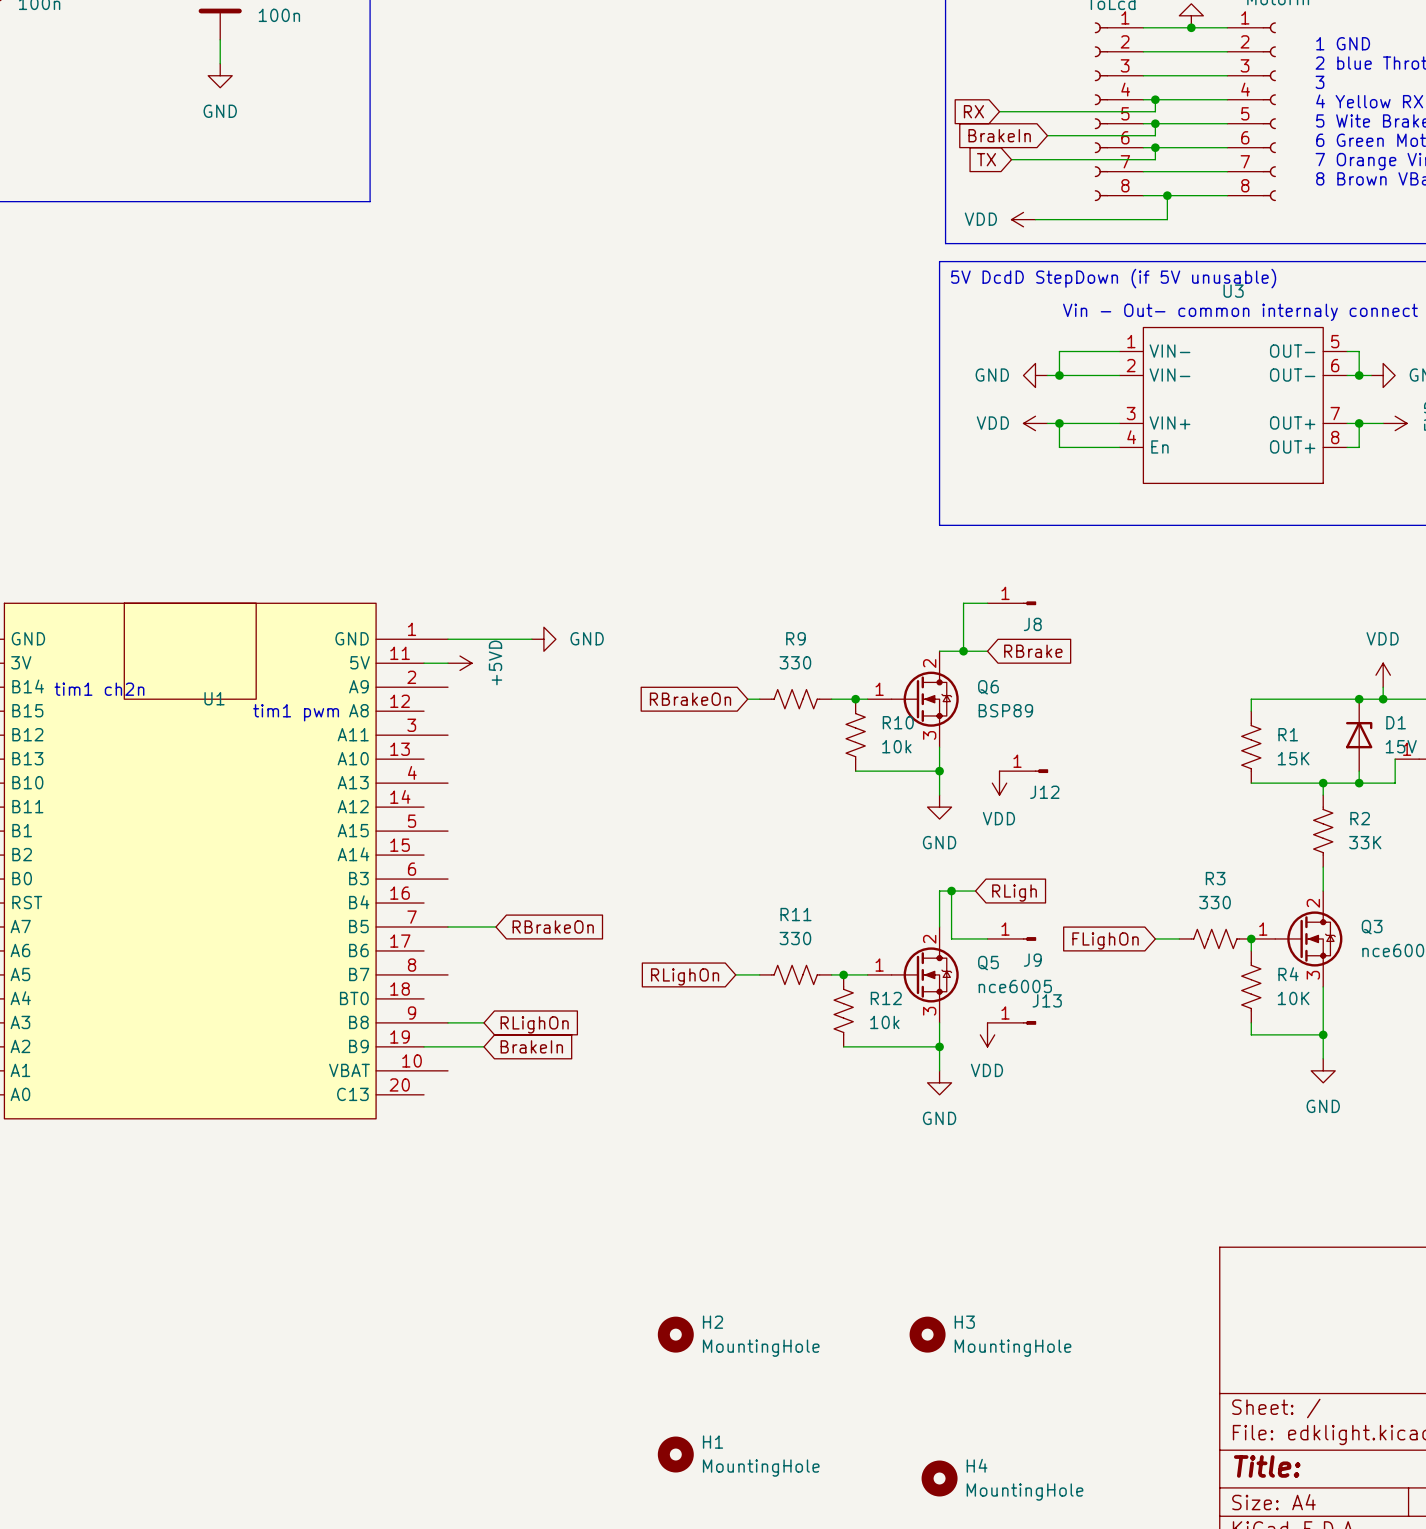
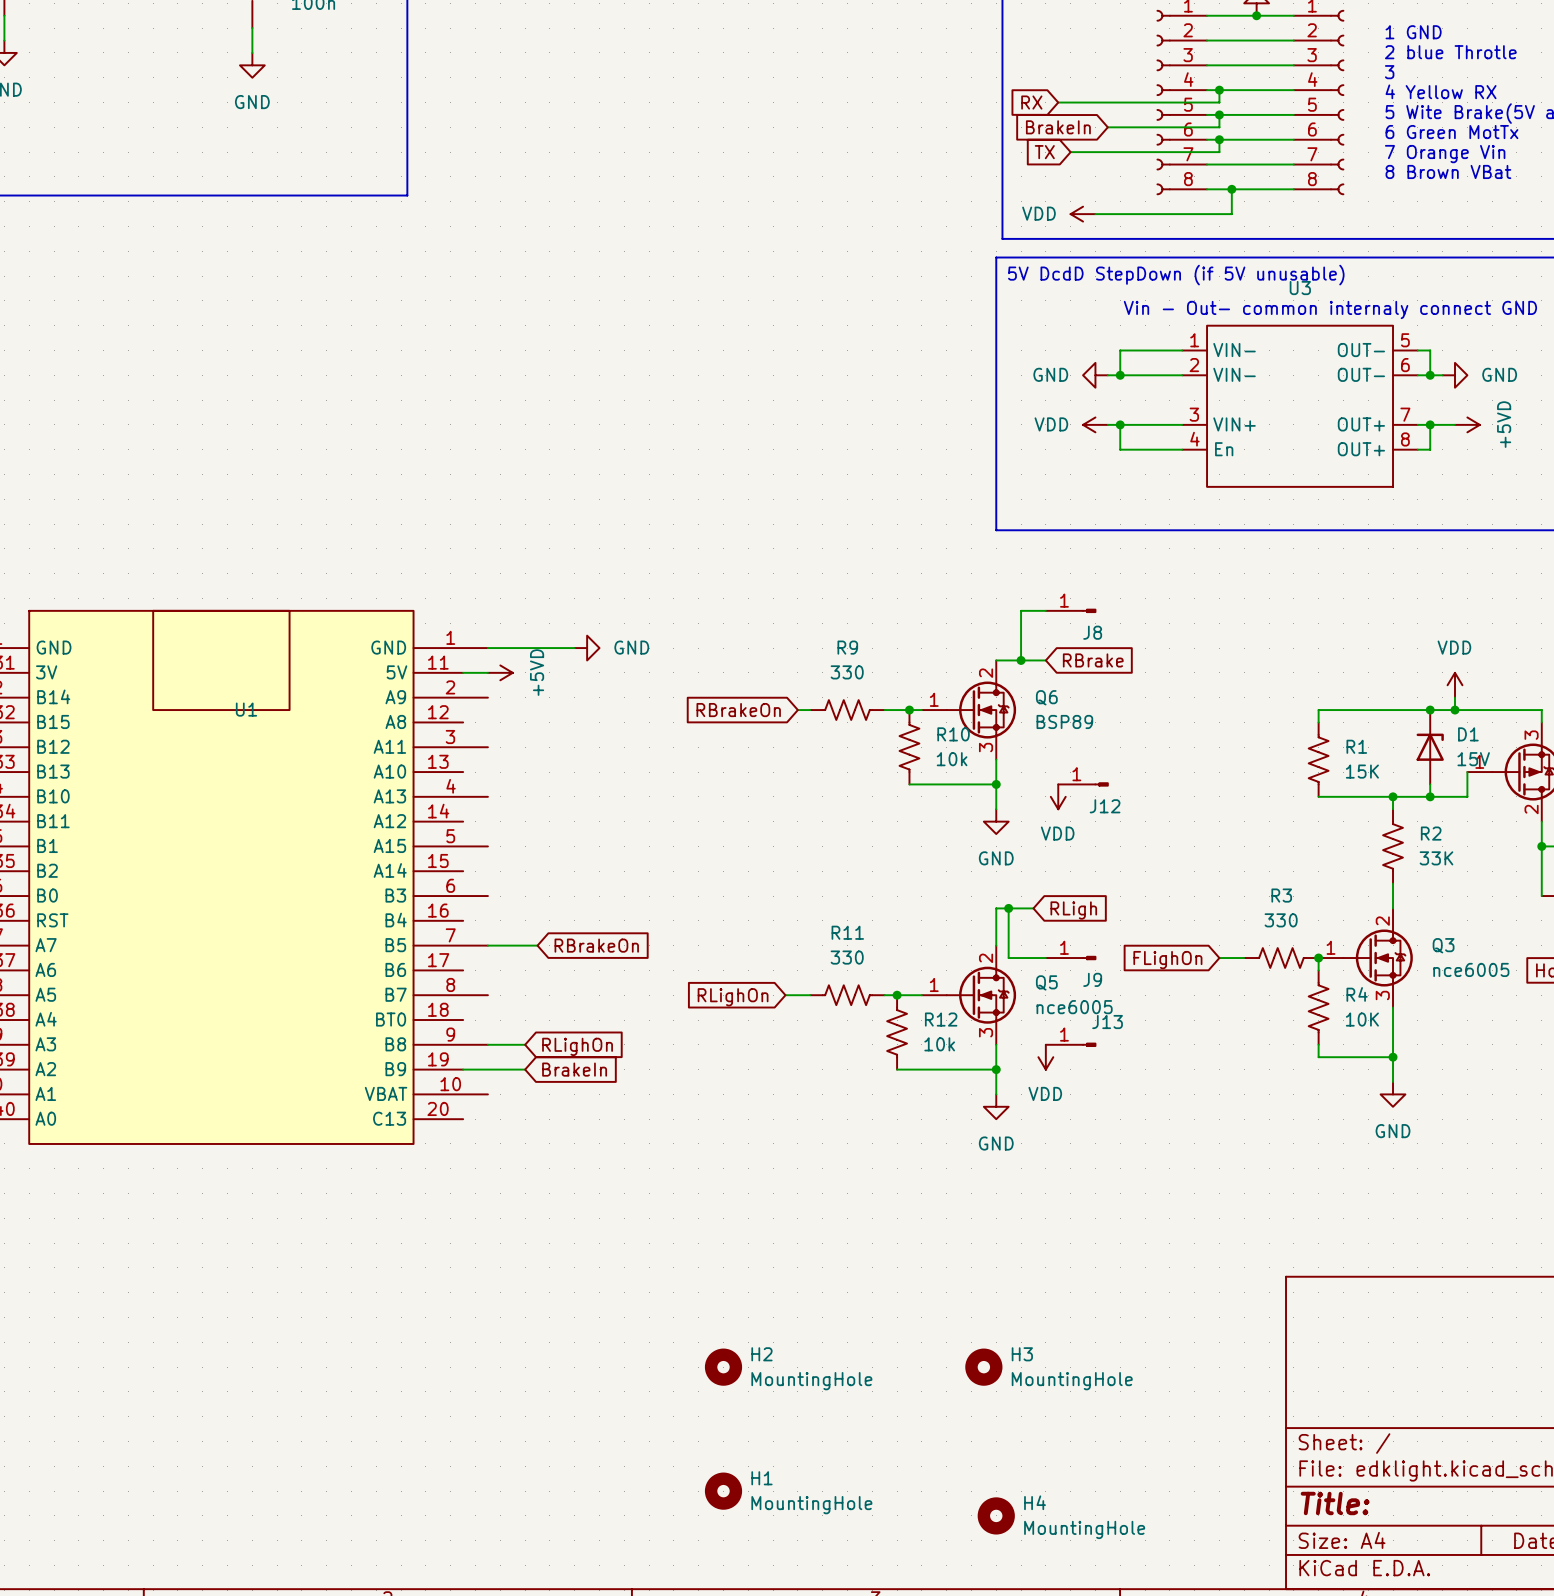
text: tim1 ch2n (99, 689) -> none
text: tim1 pwm (296, 712) -> none

